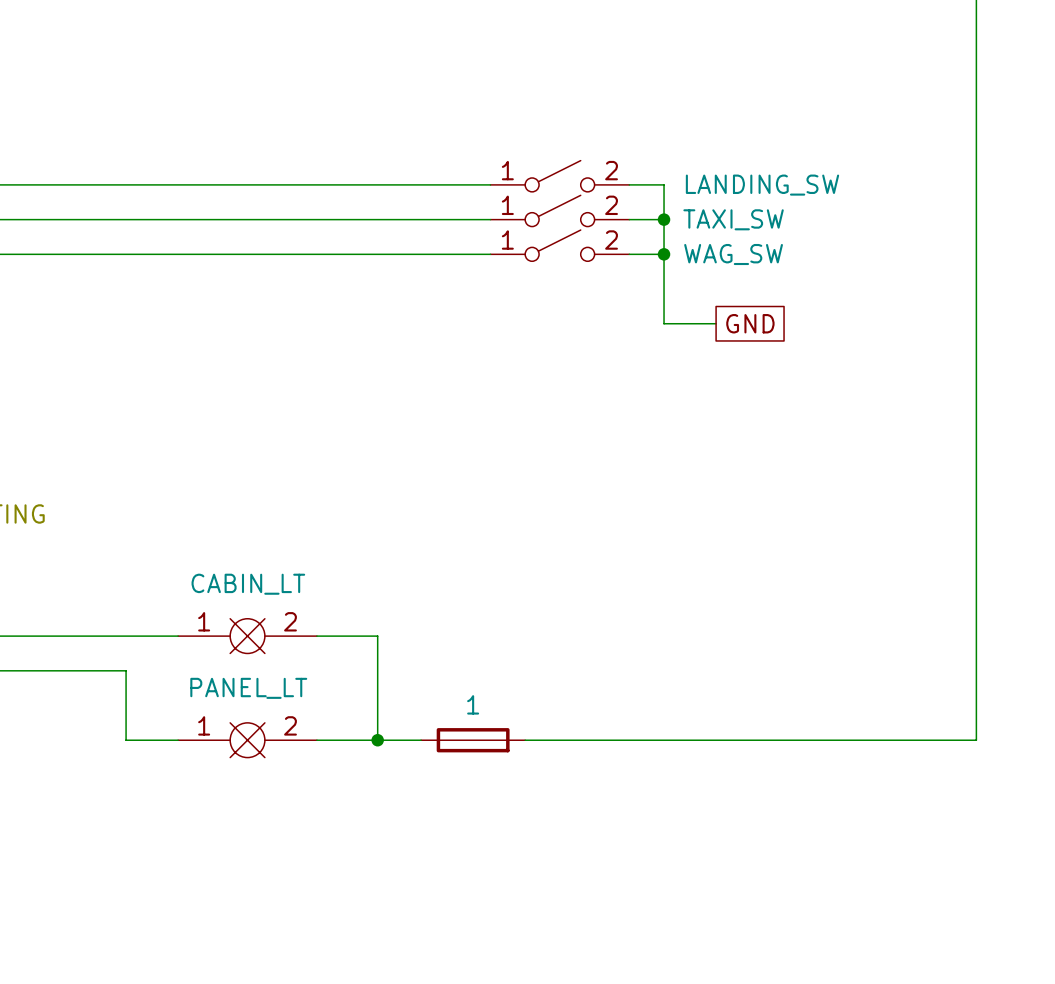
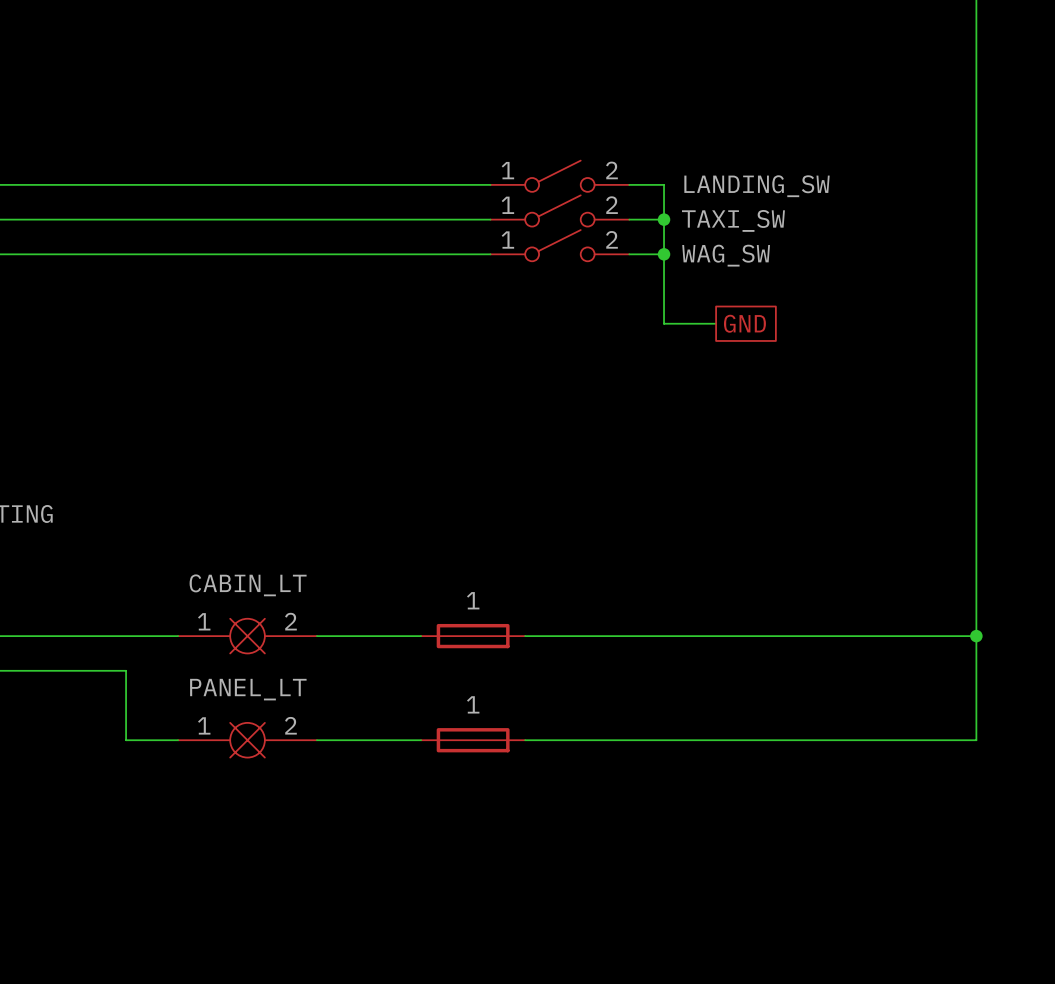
wire: (377, 636) (377, 740) -> (377, 636) (421, 636)
part: none -> 1 (473, 636)
wire: none -> (525, 636) (976, 636)
junction: none -> (976, 636)
junction: (377, 740) -> none

